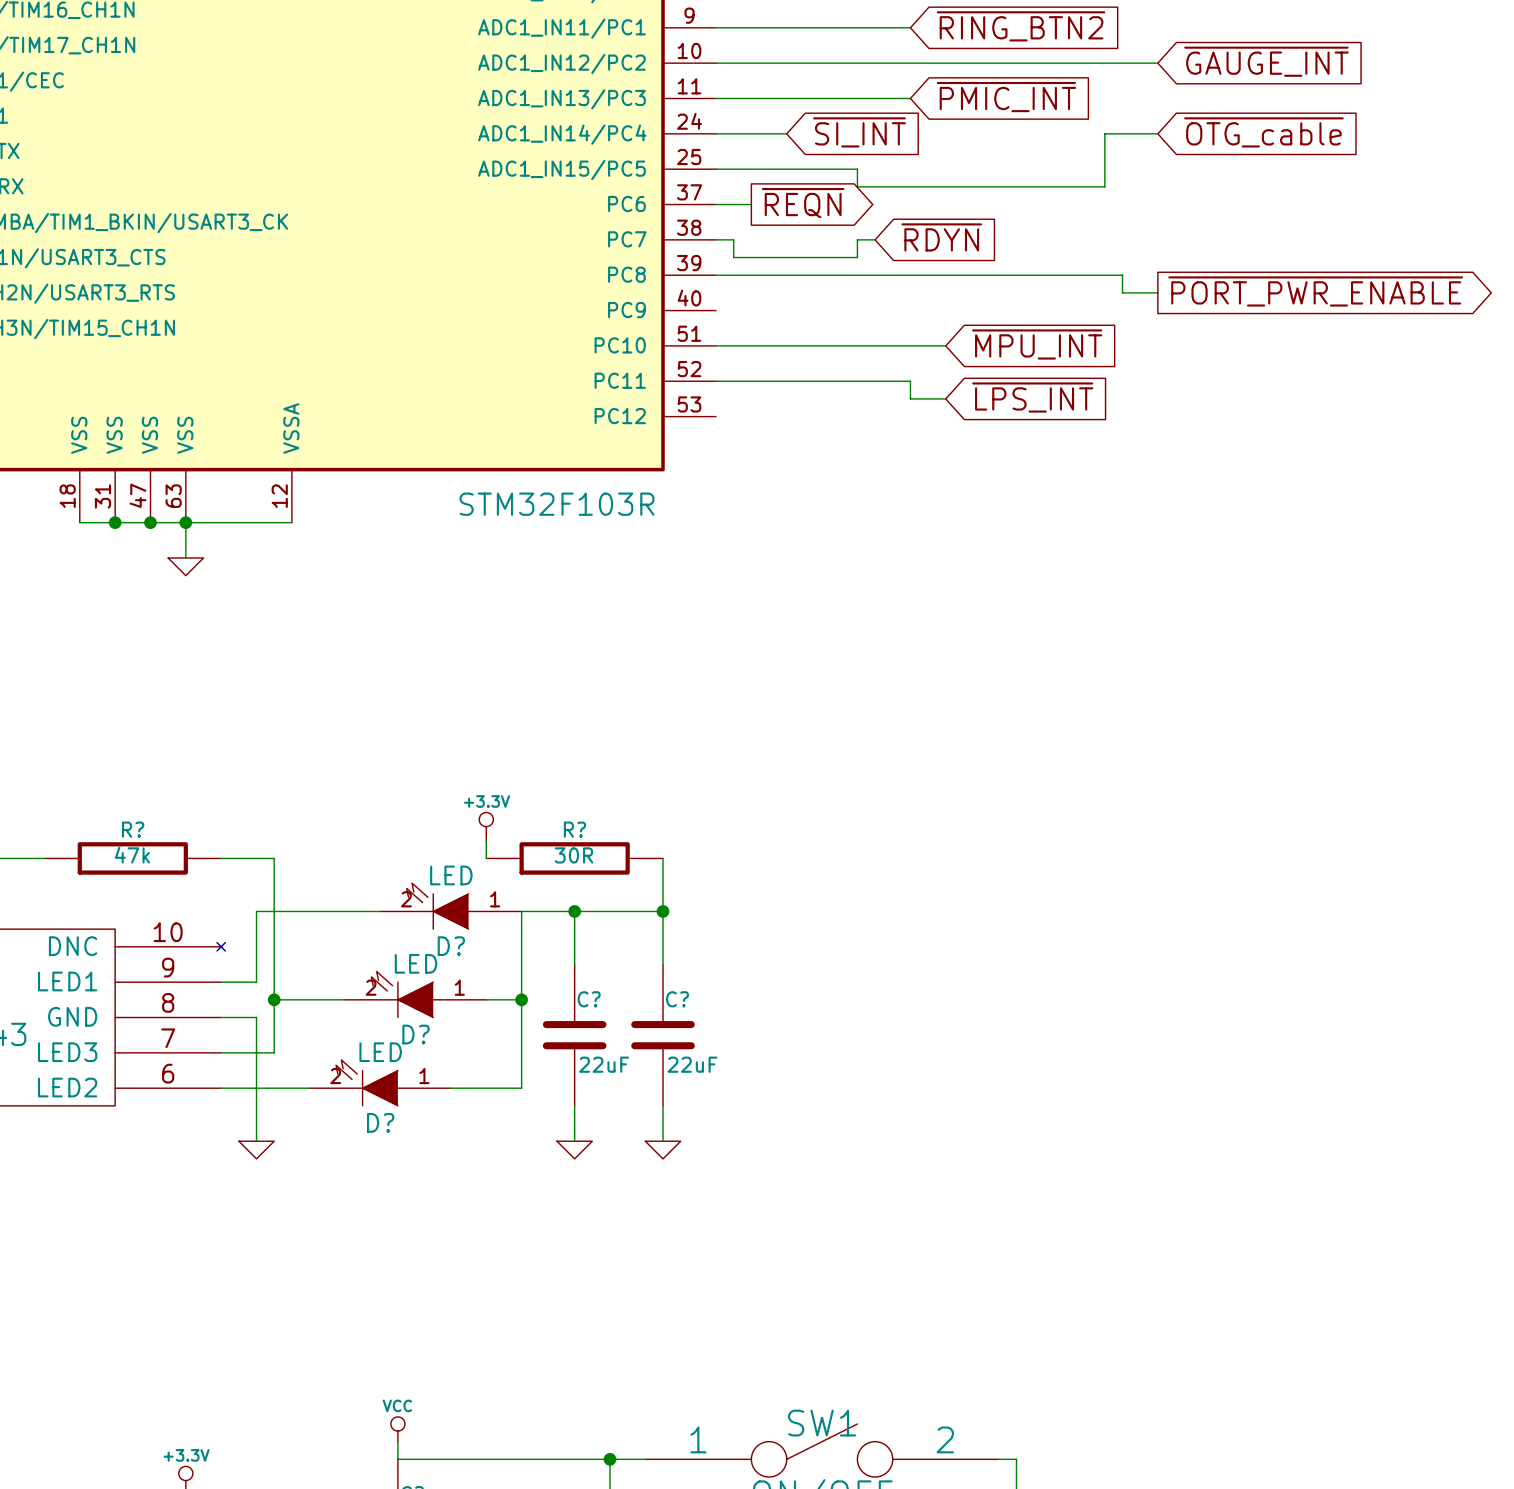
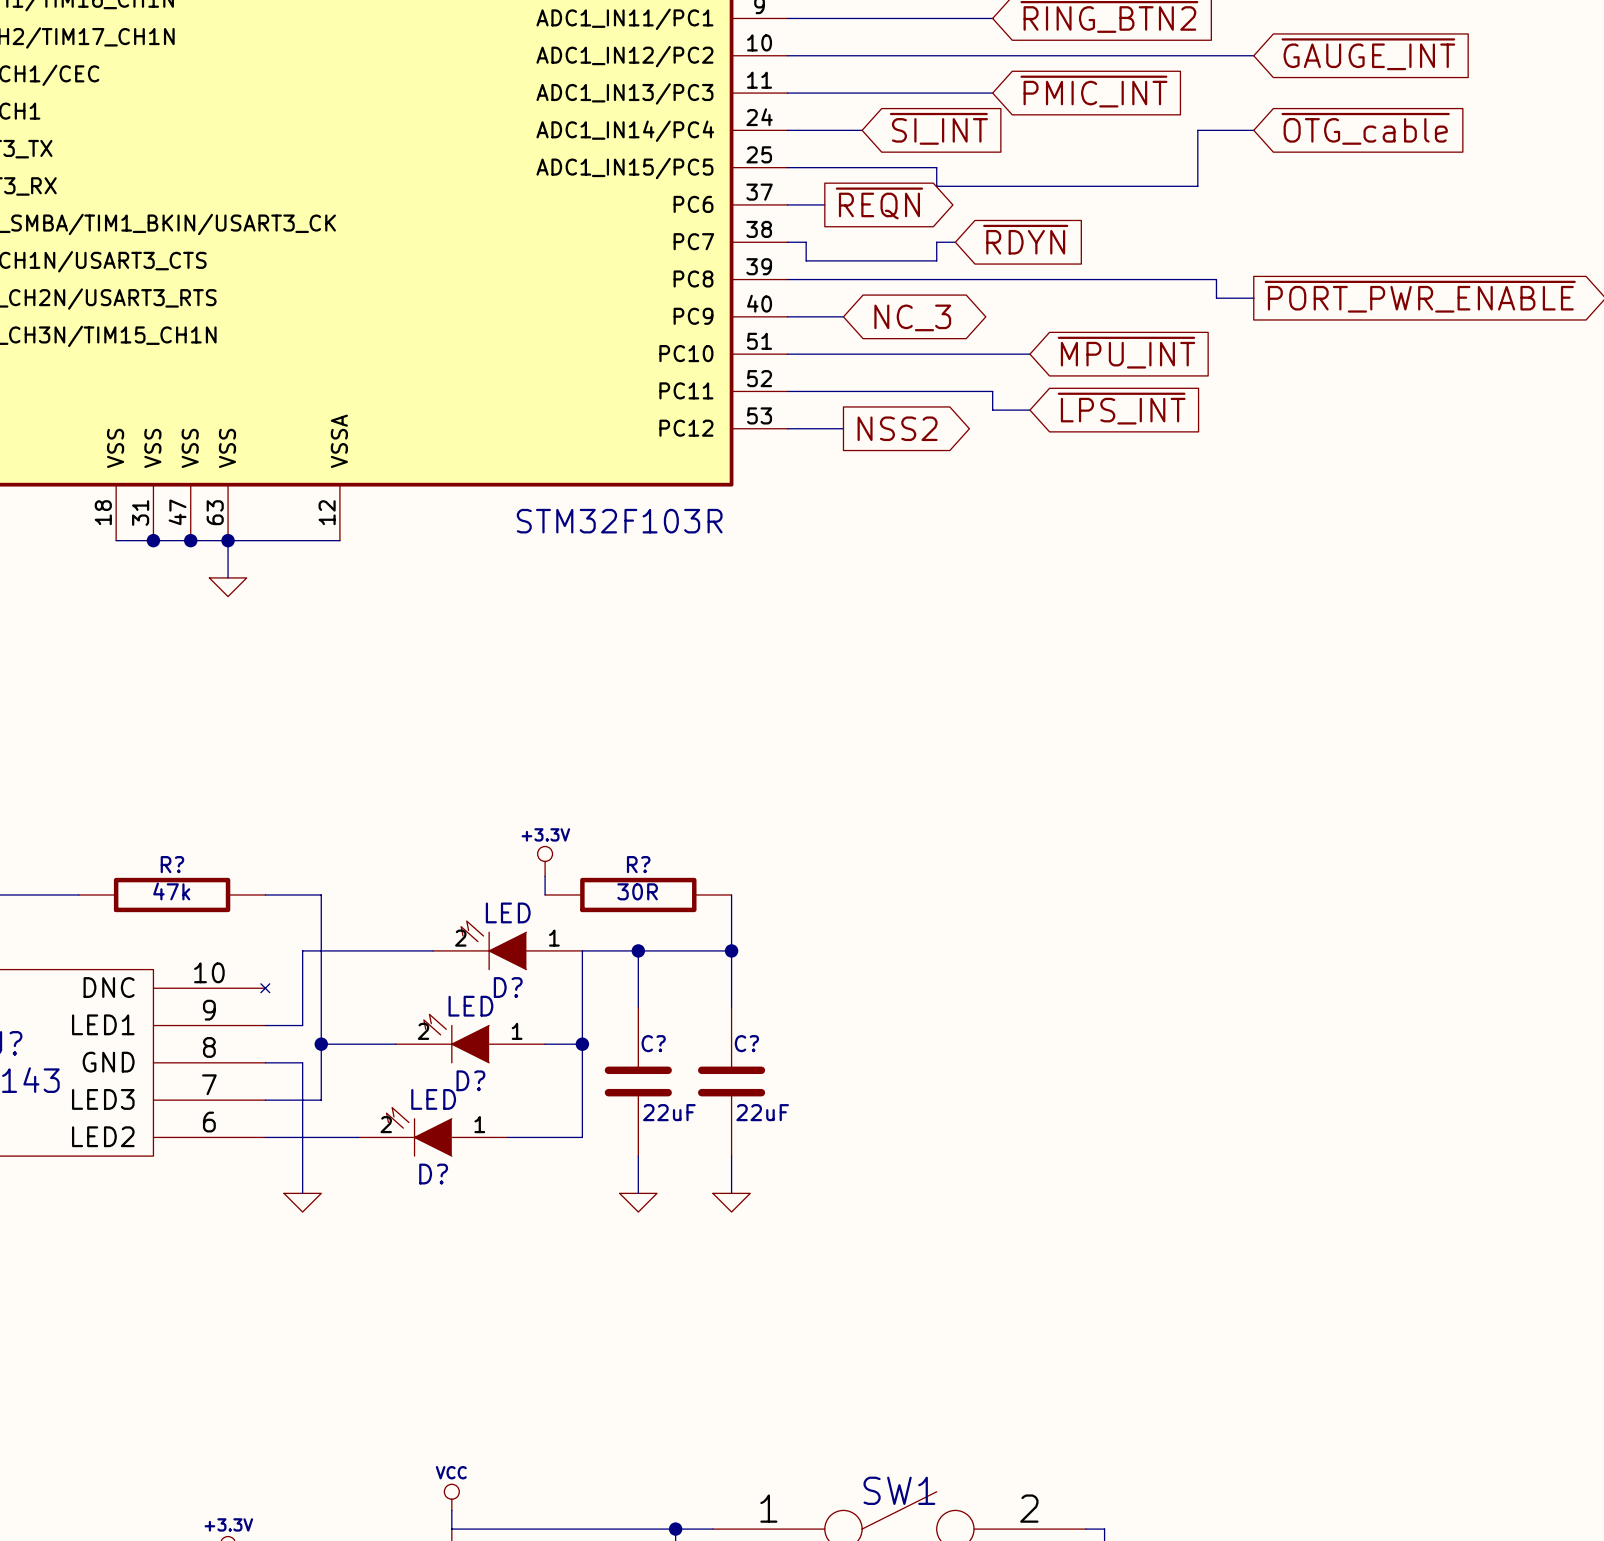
wire: none -> (787, 316) (843, 316)
global label: none -> NC_3 (912, 317)
wire: none -> (787, 428) (843, 428)
global label: none -> NSS2 (897, 428)

